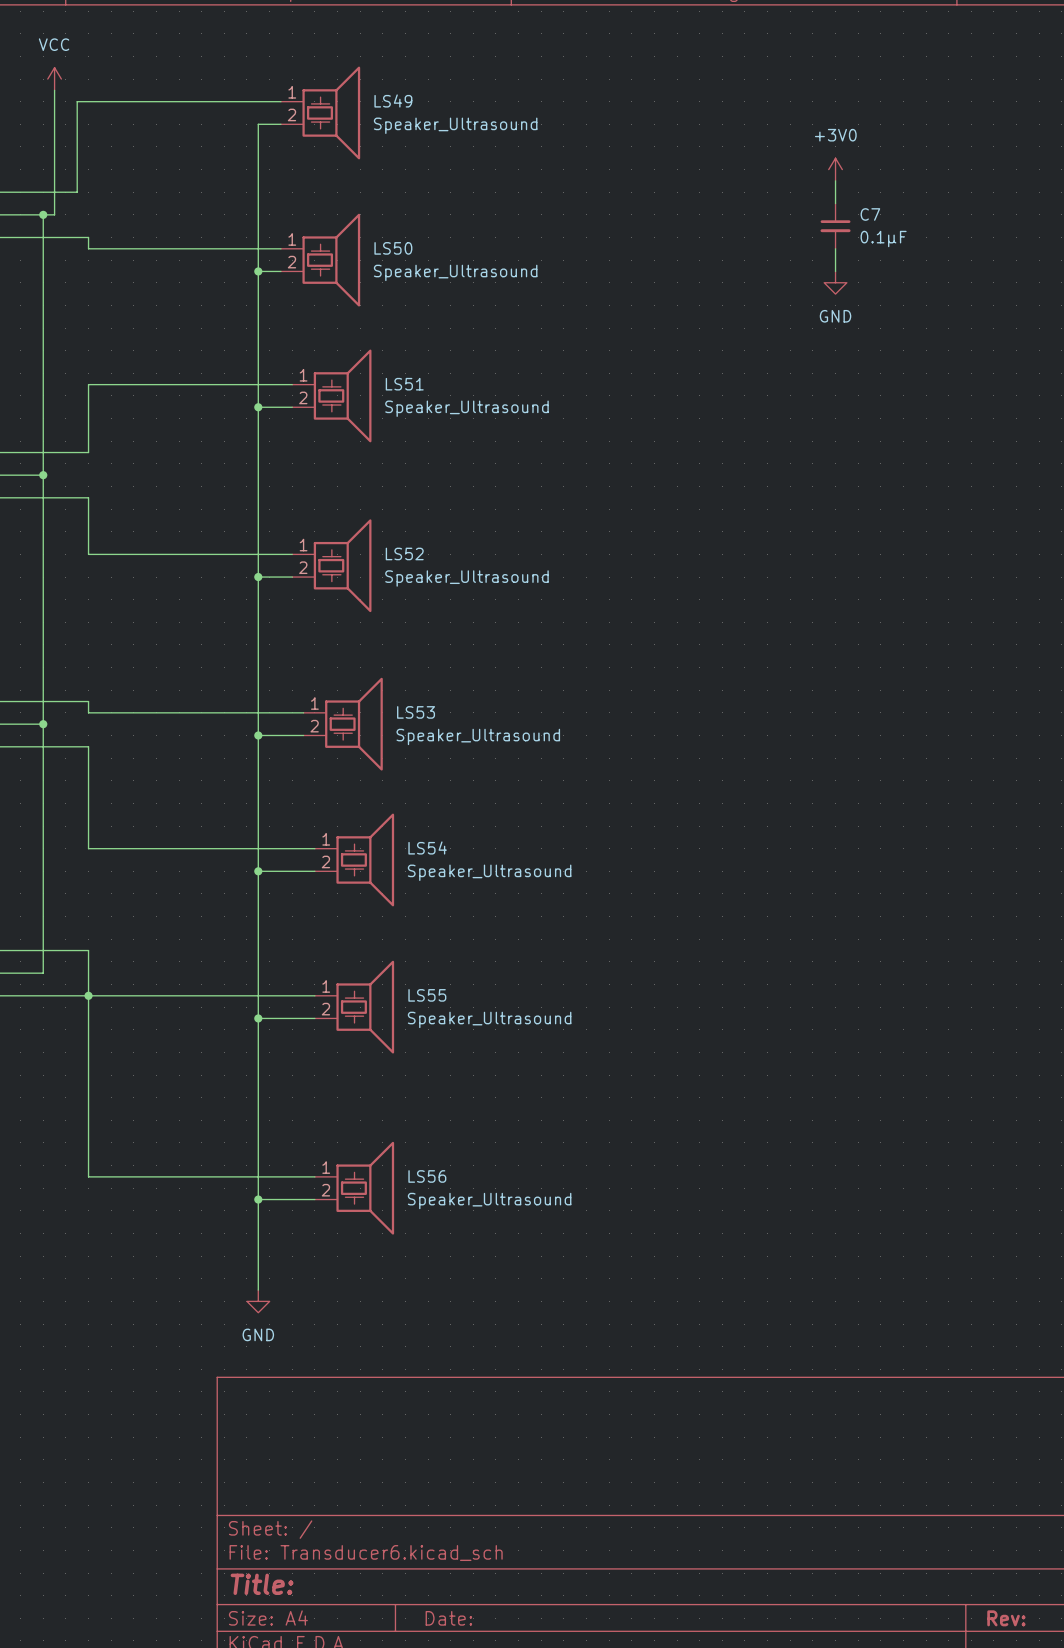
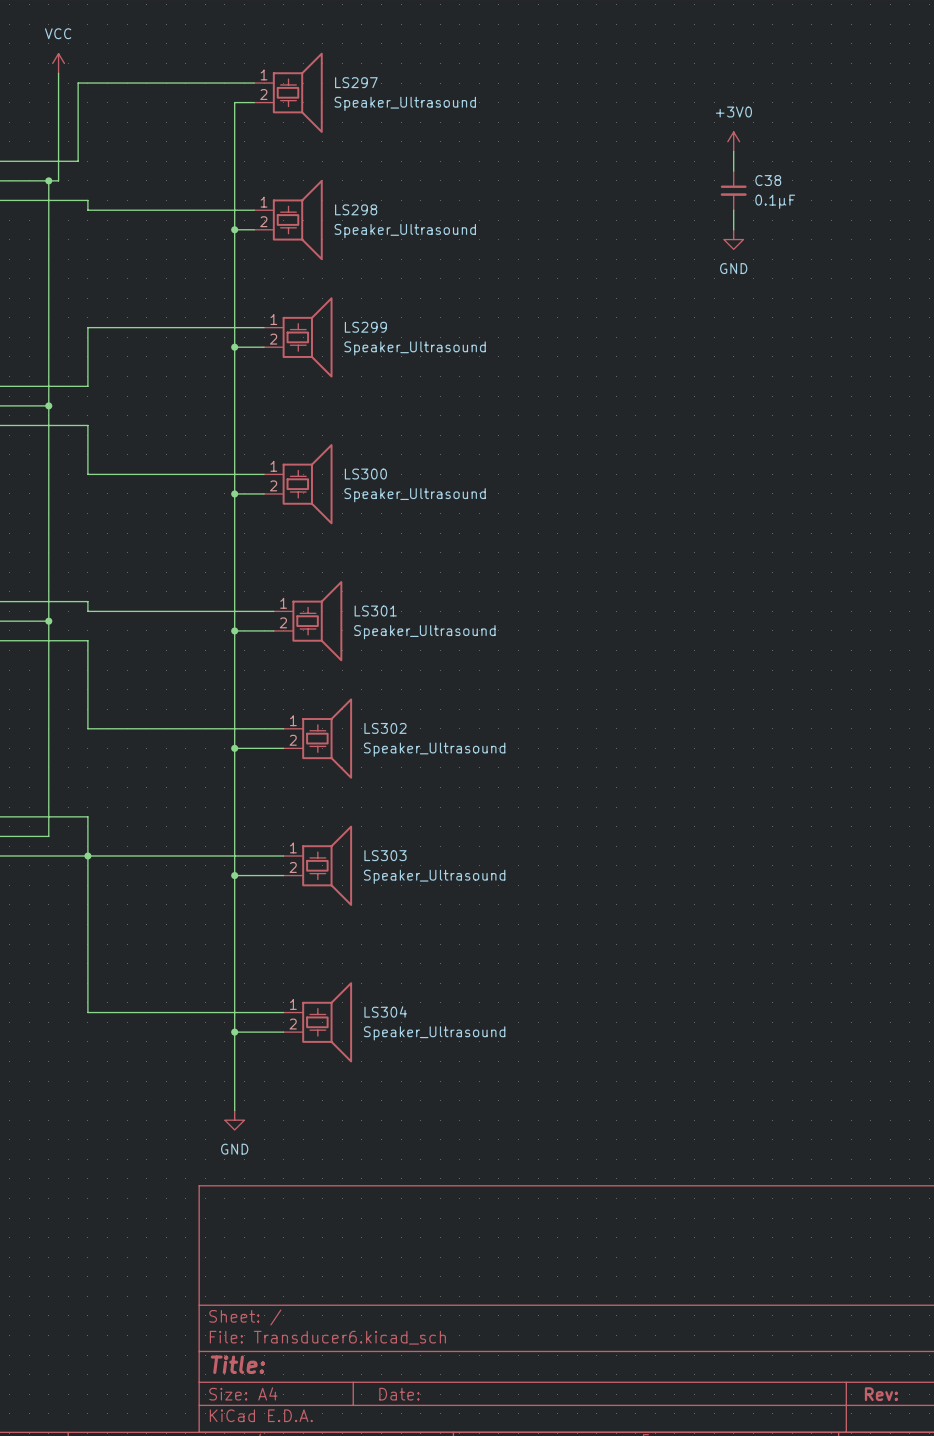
LS49 name: LS49 (393, 100) -> LS297 (356, 82)
C7 name: C7 (870, 214) -> C38 (768, 180)
LS50 name: LS50 (393, 248) -> LS298 (356, 209)
LS51 name: LS51 (404, 384) -> LS299 (365, 327)
LS52 name: LS52 (404, 553) -> LS300 (365, 474)
LS53 name: LS53 (416, 712) -> LS301 (375, 611)
LS54 name: LS54 (427, 847) -> LS302 (385, 728)
LS55 name: LS55 (427, 995) -> LS303 (385, 855)
LS56 name: LS56 (427, 1176) -> LS304 (385, 1011)

